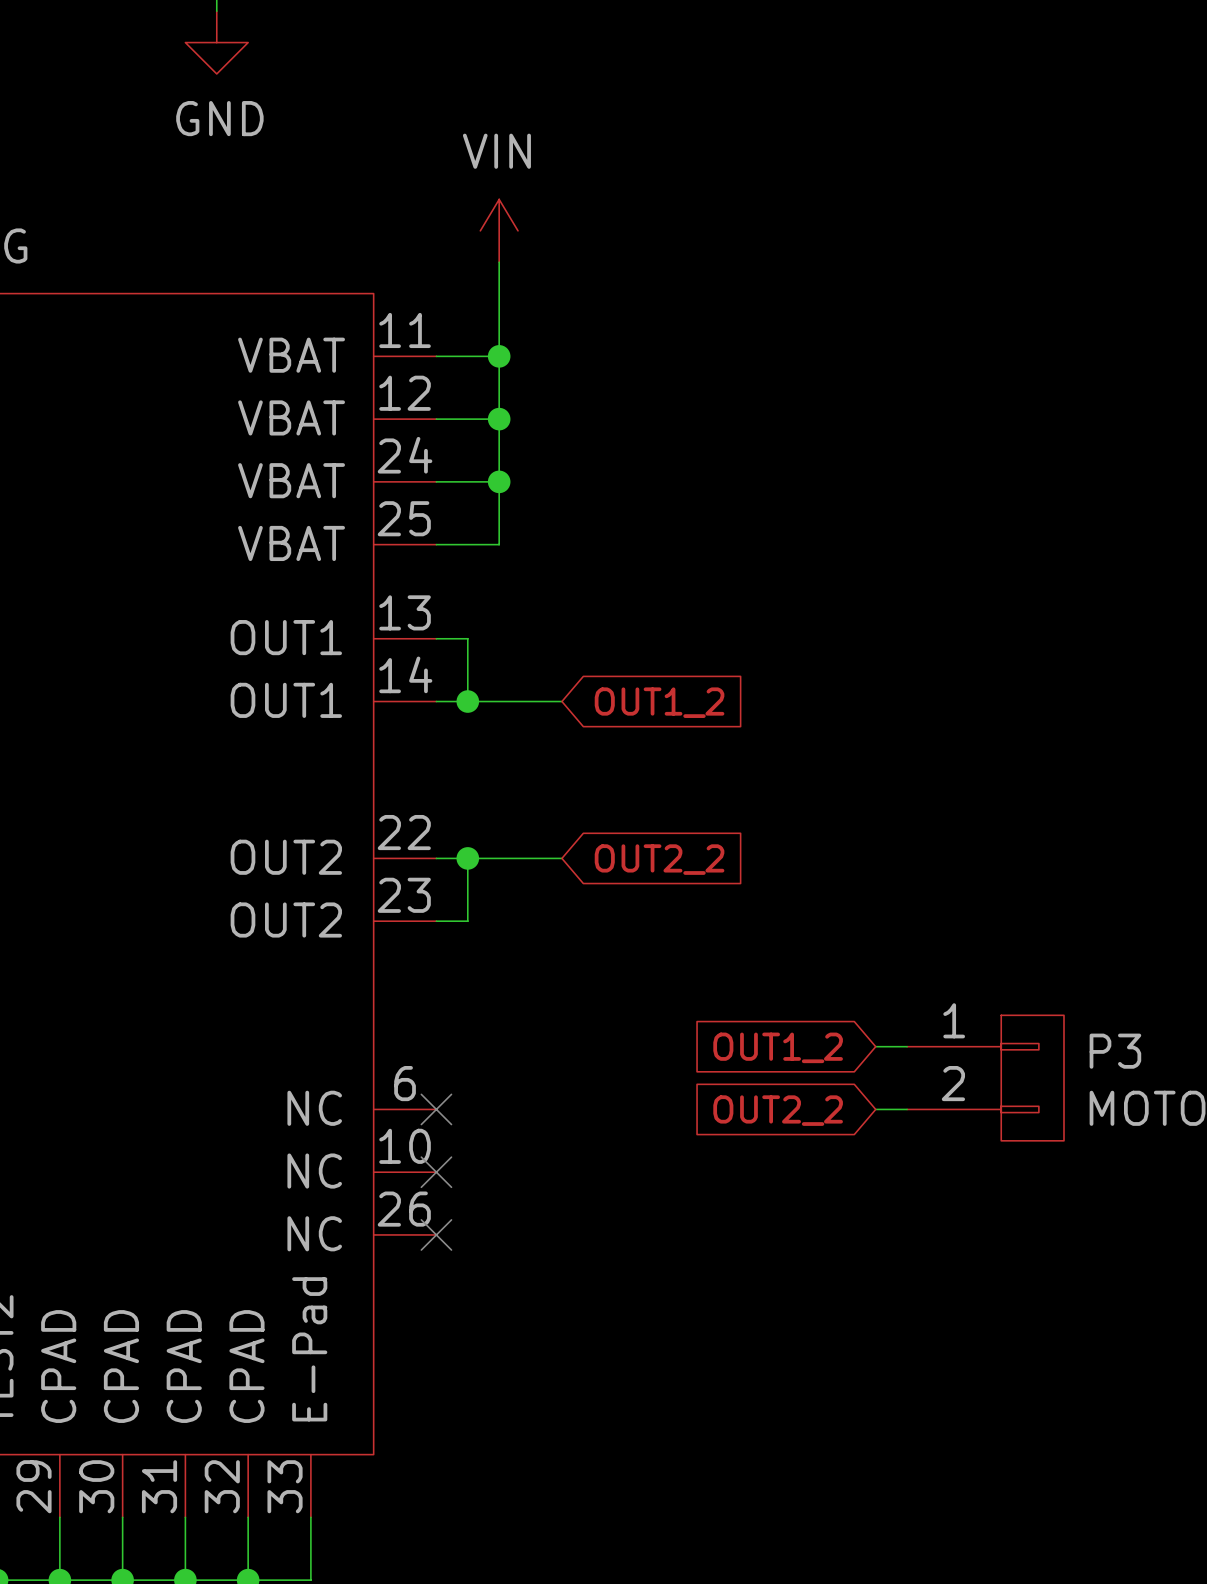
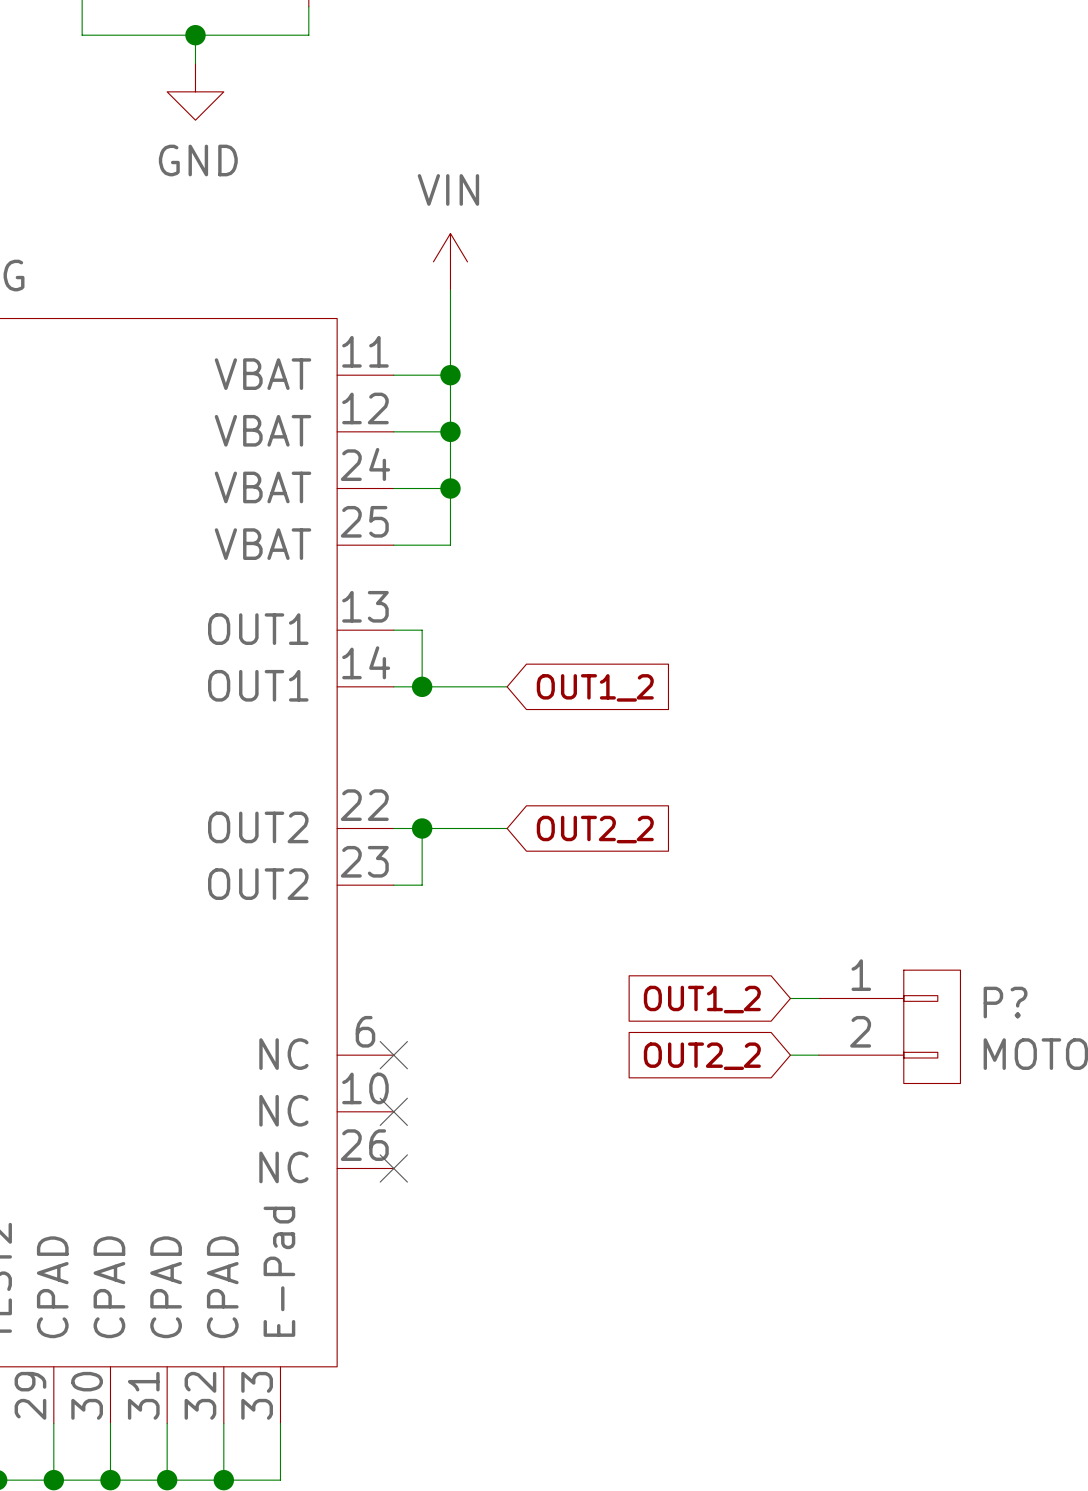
P3 name: P3 (1115, 1051) -> P? (1005, 1002)

